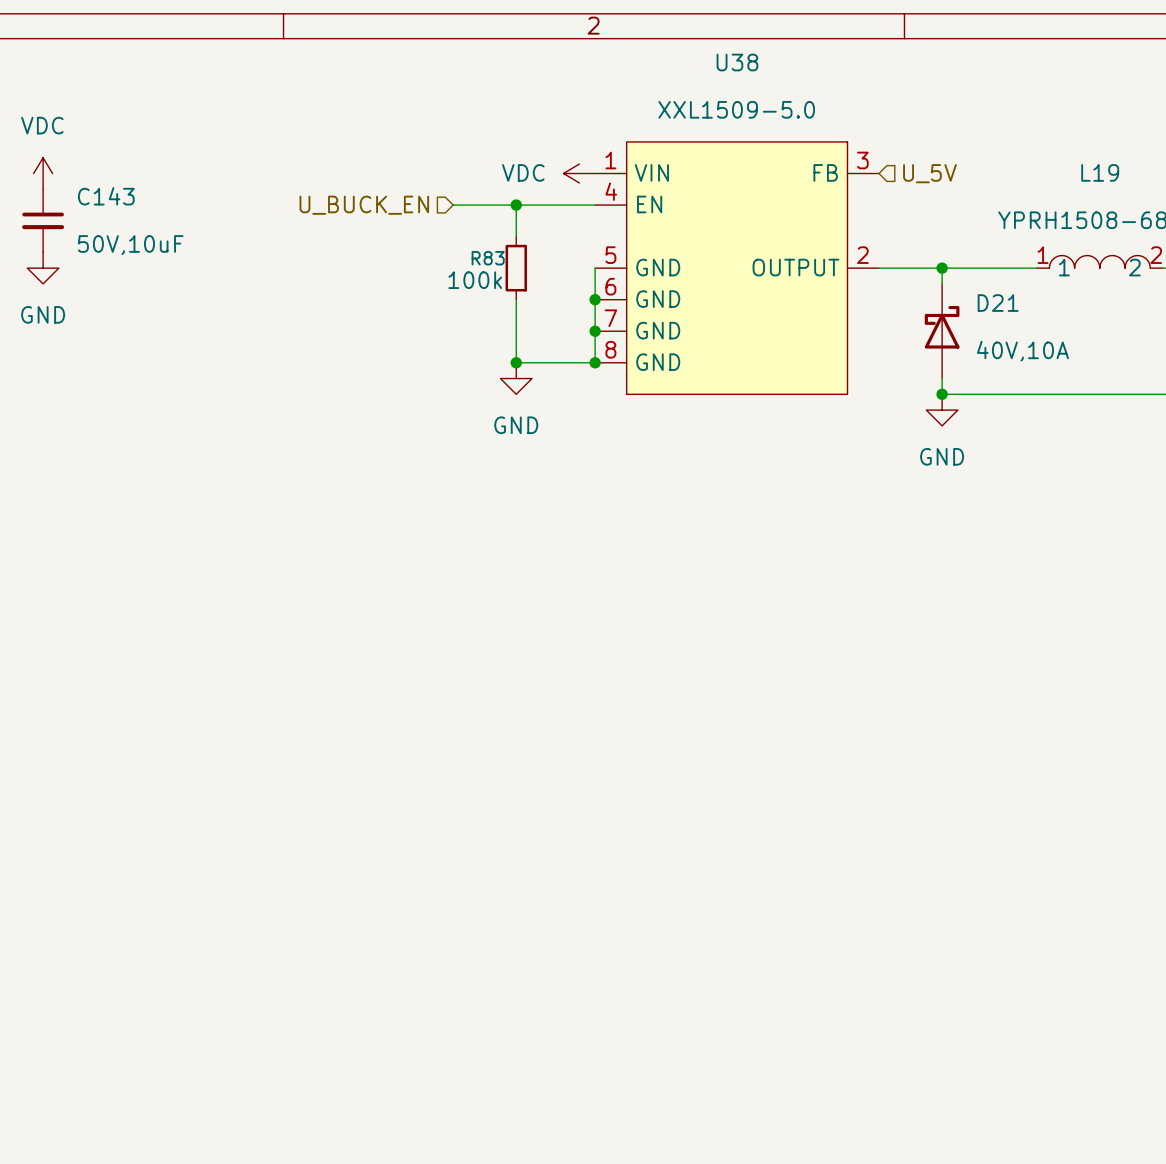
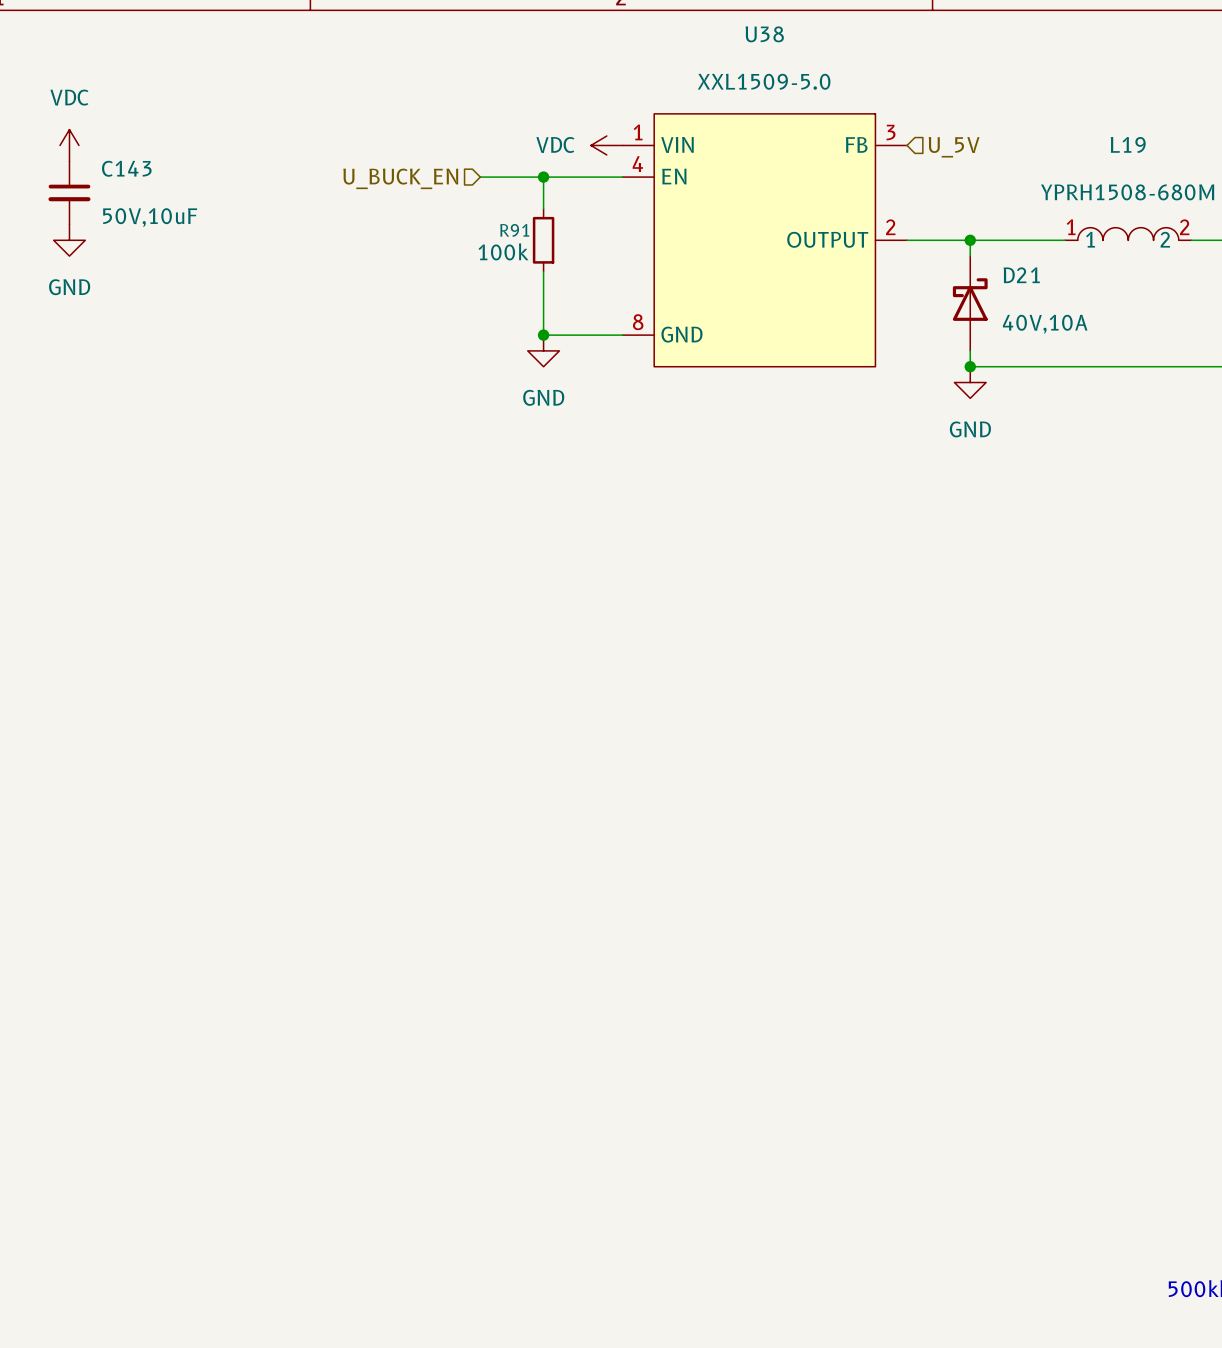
U38 symbol: [595, 141, 880, 395] -> [622, 113, 908, 367]
R83 name: R83 (488, 258) -> R91 (514, 230)
wire: (595, 268) (595, 362) -> none
junction: (595, 299) -> none
junction: (595, 331) -> none
junction: (595, 362) -> none

